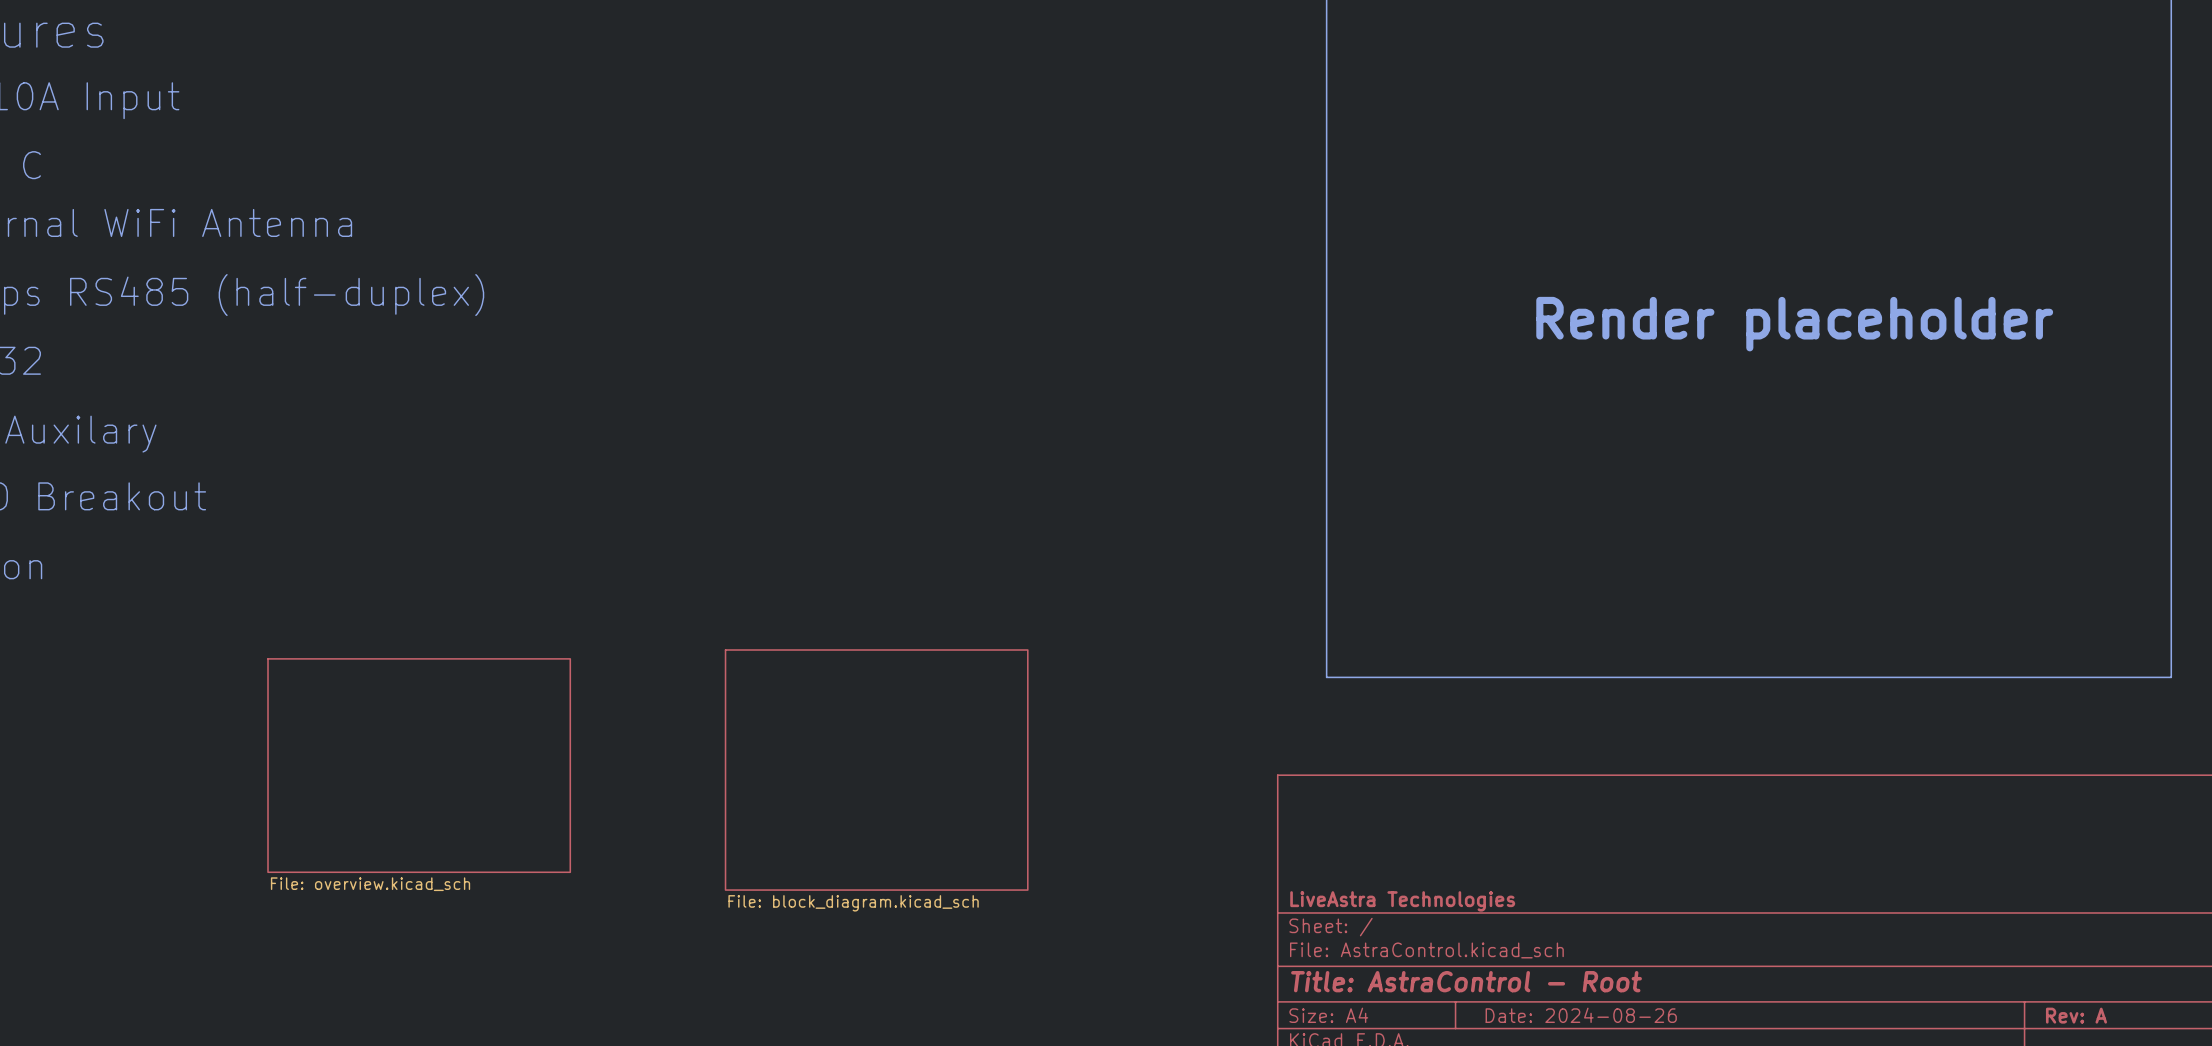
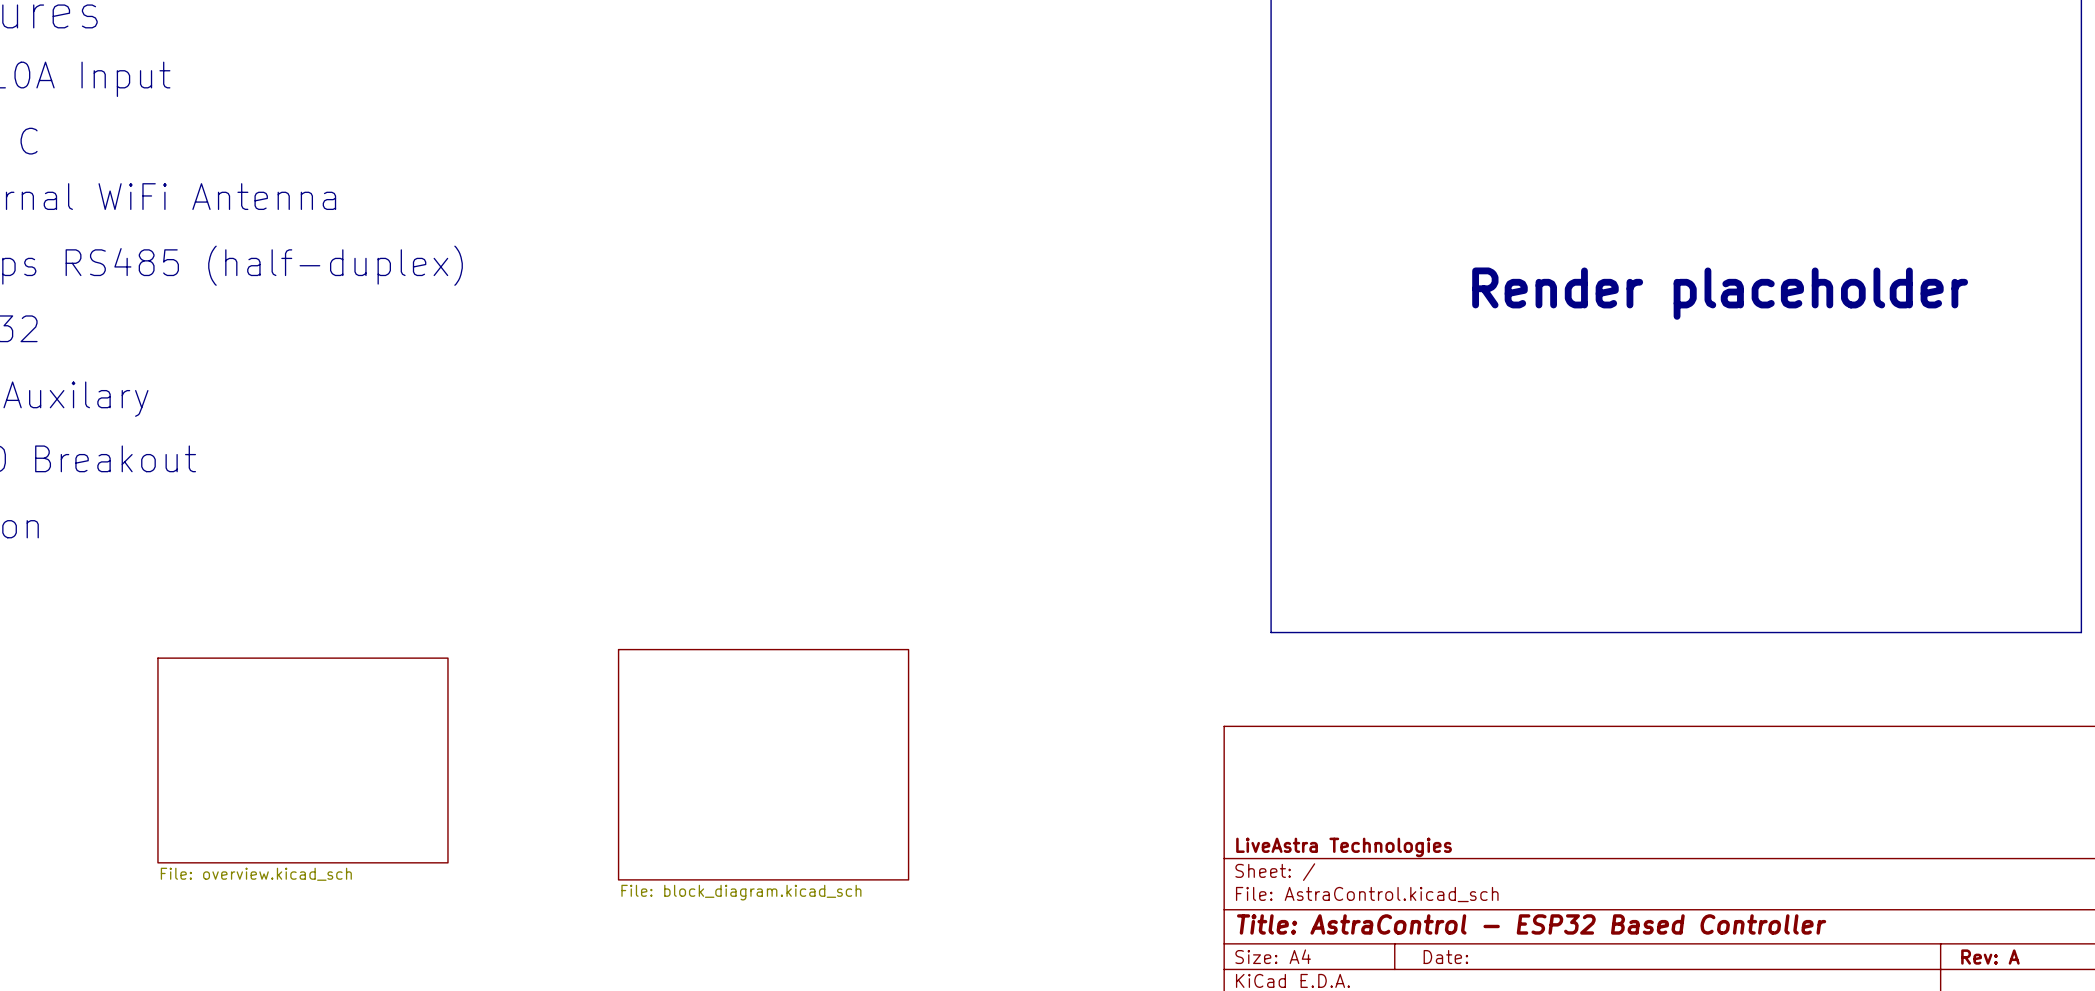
sheet position: (419, 765) -> (302, 760)
sheet position: (876, 770) -> (763, 764)
title block: Title: AstraControl - Root (1466, 981) -> Title: AstraControl - ESP32 Based Controller (1531, 924)
title block: Date: 2024-08-26 (1581, 1015) -> Date: (1445, 957)

